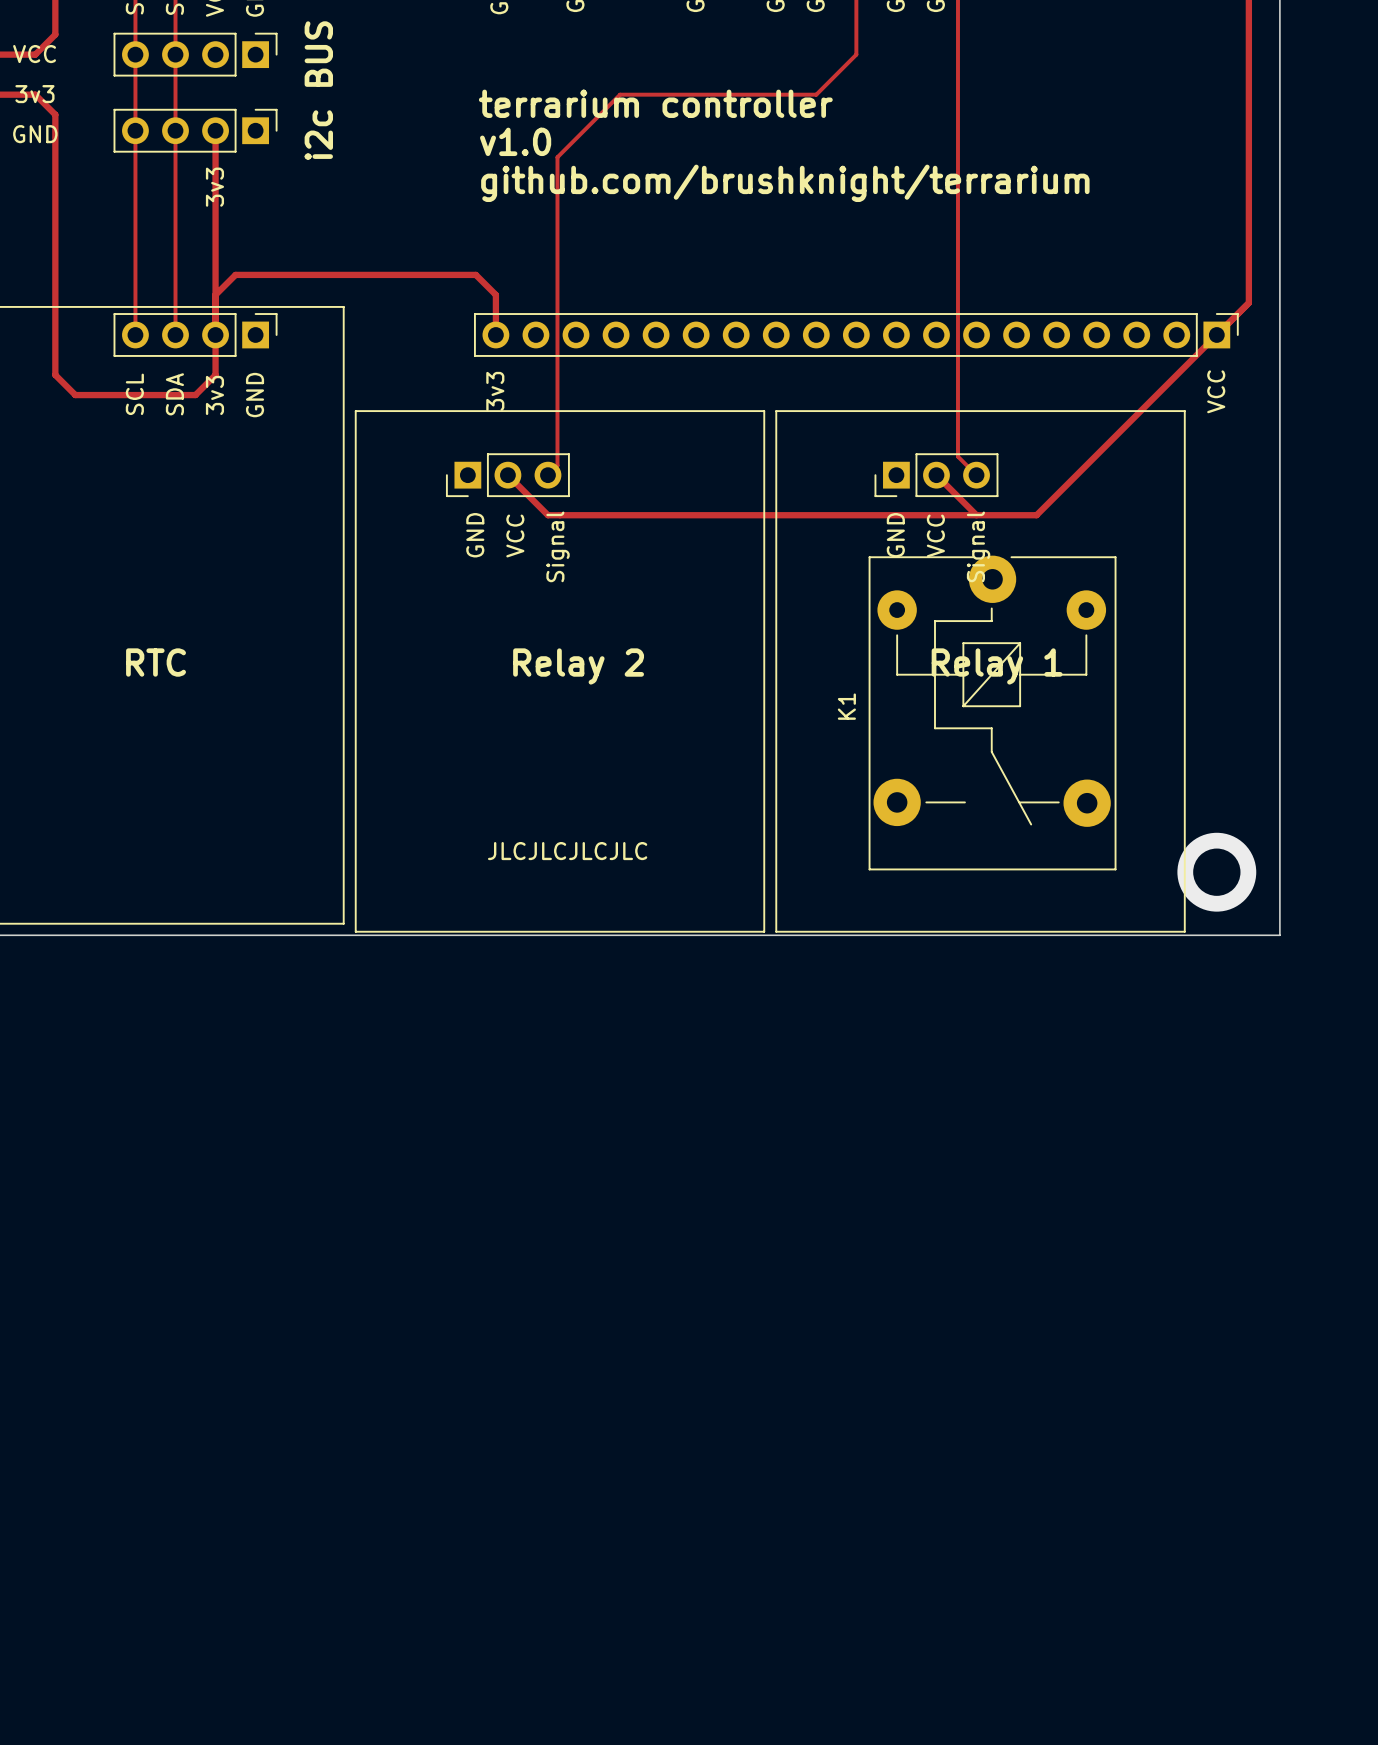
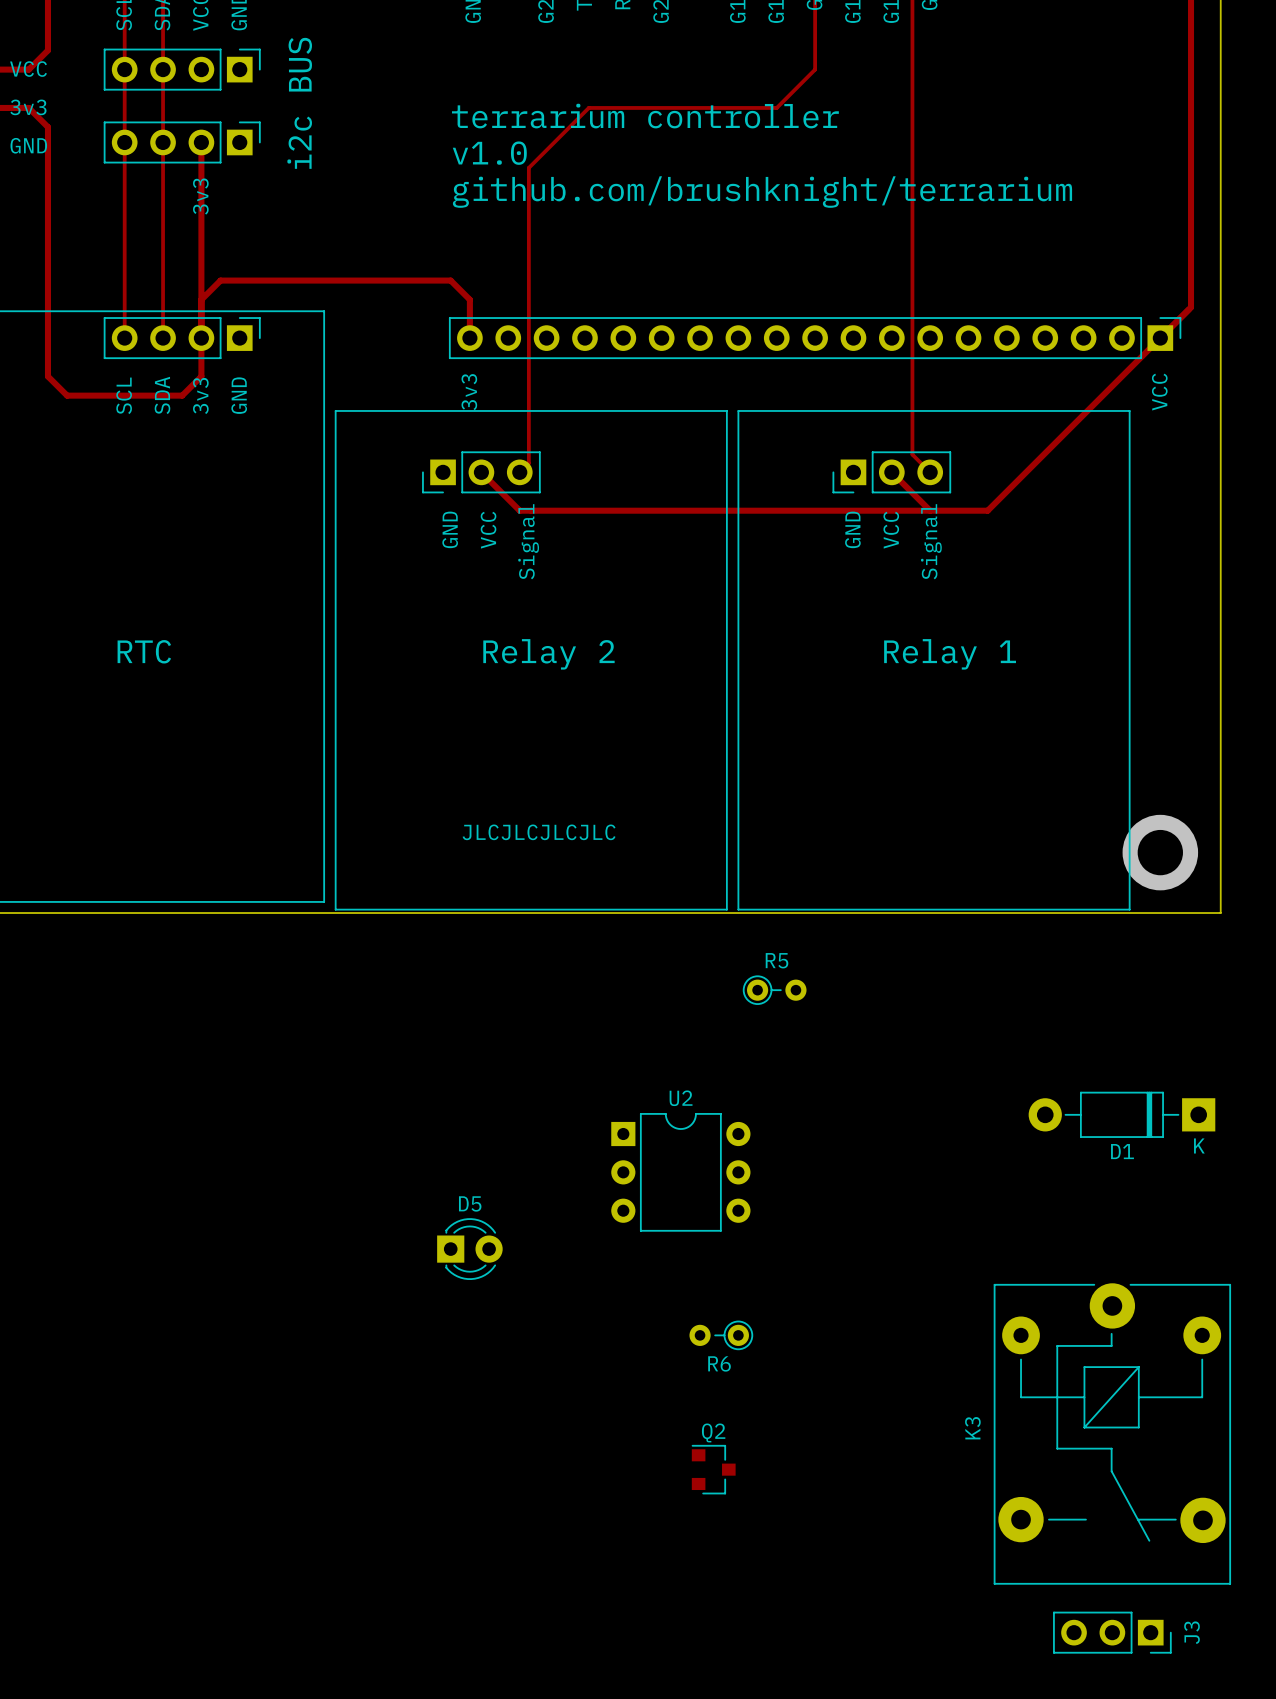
K1: (992, 713) -> none
R5: none -> (774, 990)
D1: none -> (1121, 1114)
U2: none -> (680, 1172)
D5: none -> (469, 1249)
R6: none -> (721, 1335)
K3: none -> (1112, 1433)
Q2: none -> (713, 1469)
J3: none -> (1112, 1632)

